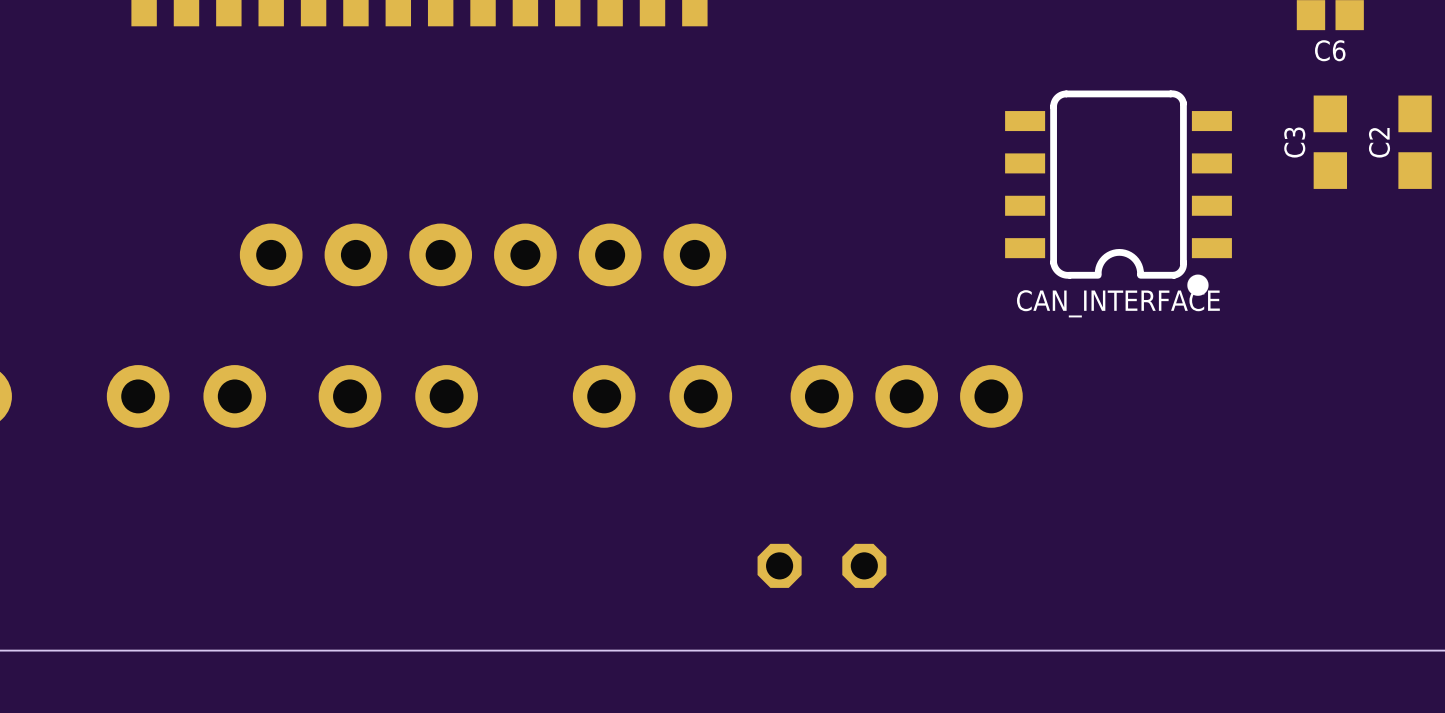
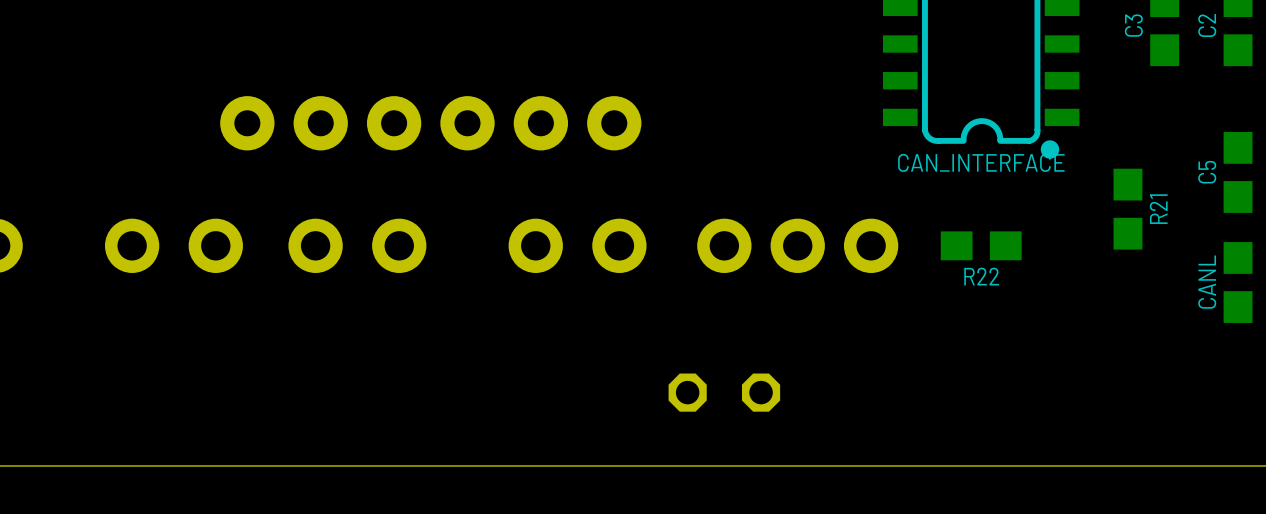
C5: none -> (1238, 172)
R21: none -> (1127, 209)
R22: none -> (981, 245)
CANL: none -> (1238, 282)

